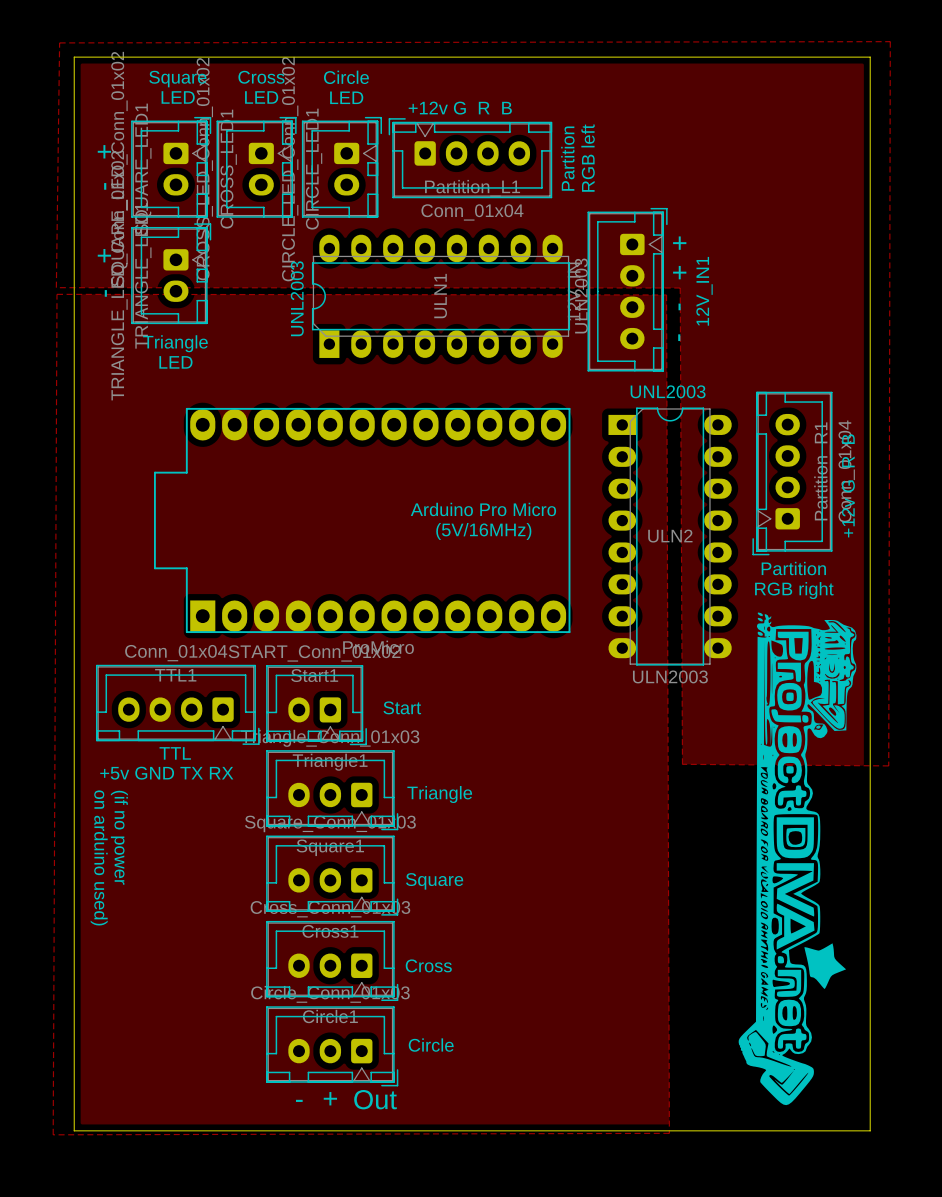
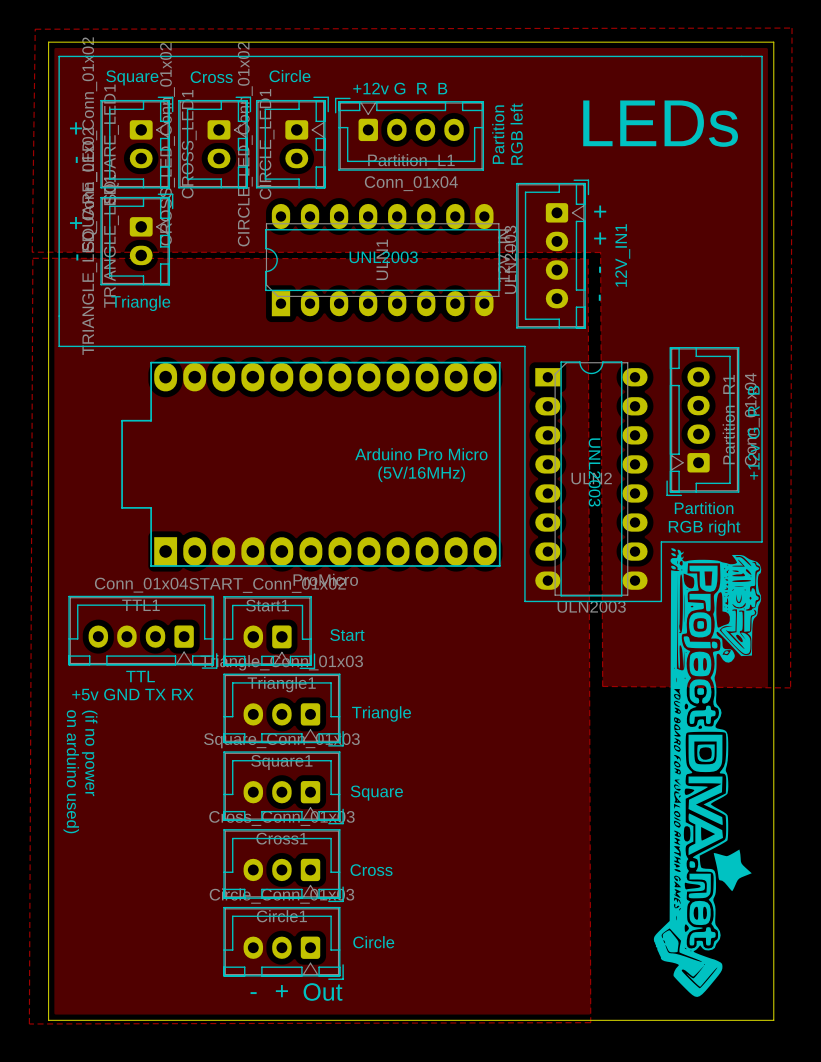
line: none -> (59, 56) (59, 346) (524, 346) (524, 601) (661, 601) (661, 541) (762, 541) (762, 56) (59, 56)
text position: Cross (261, 77) -> Cross (211, 77)
text position: Circle (346, 77) -> Circle (289, 76)
text position: Square (177, 79) -> Square (132, 77)
text: LED (178, 97) -> none
text: LED (261, 97) -> none
text: LED (346, 97) -> none
text: none -> LEDs (660, 123)
text: none -> UNL2003 (383, 257)
text: UNL2003 (297, 298) -> none
text: LED (175, 362) -> none
text: UNL2003 (668, 391) -> none
text: none -> UNL2003 (594, 472)

